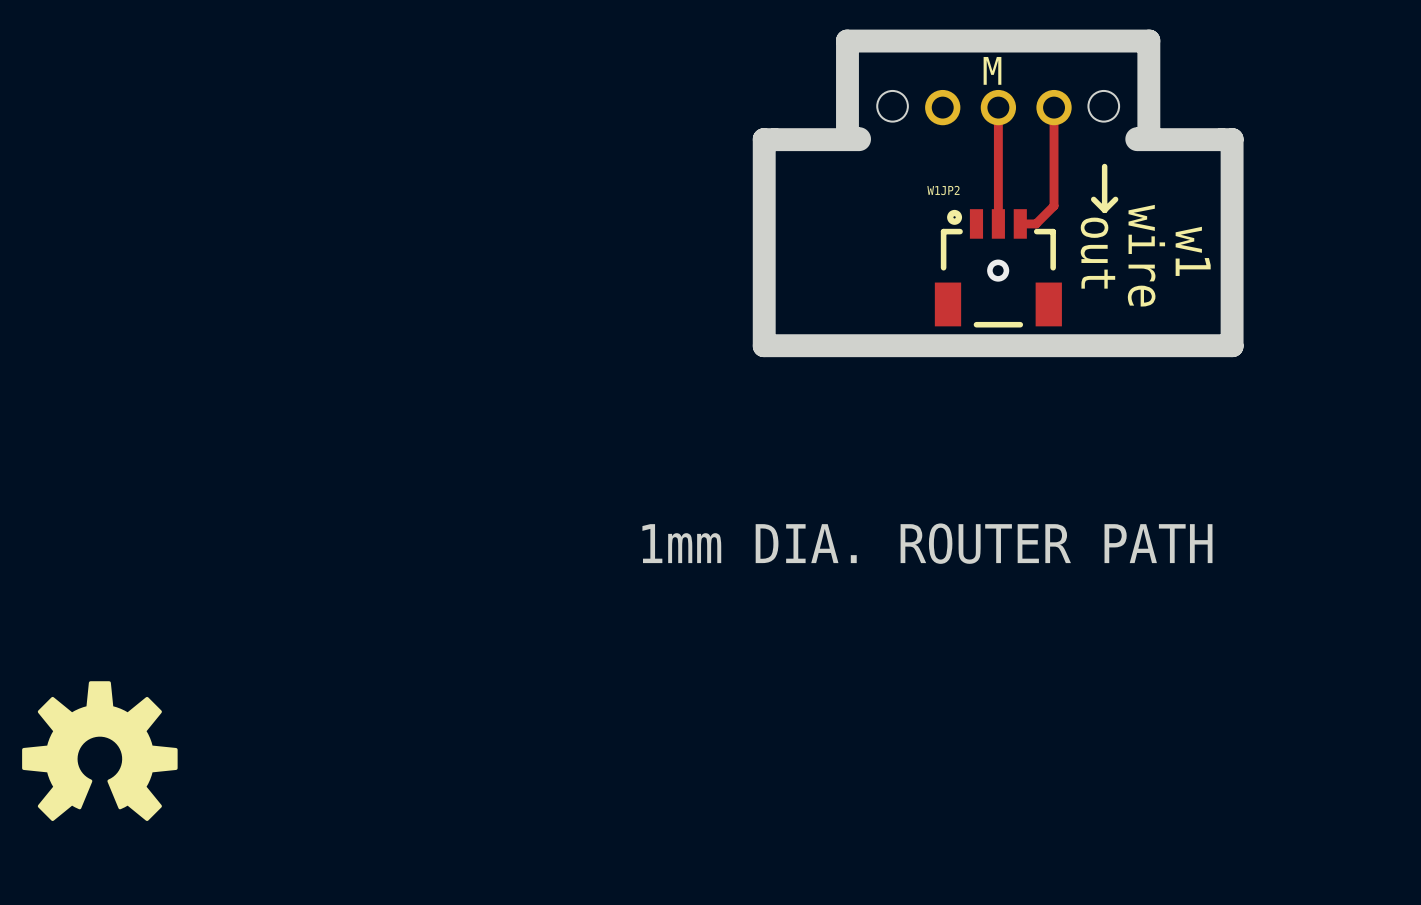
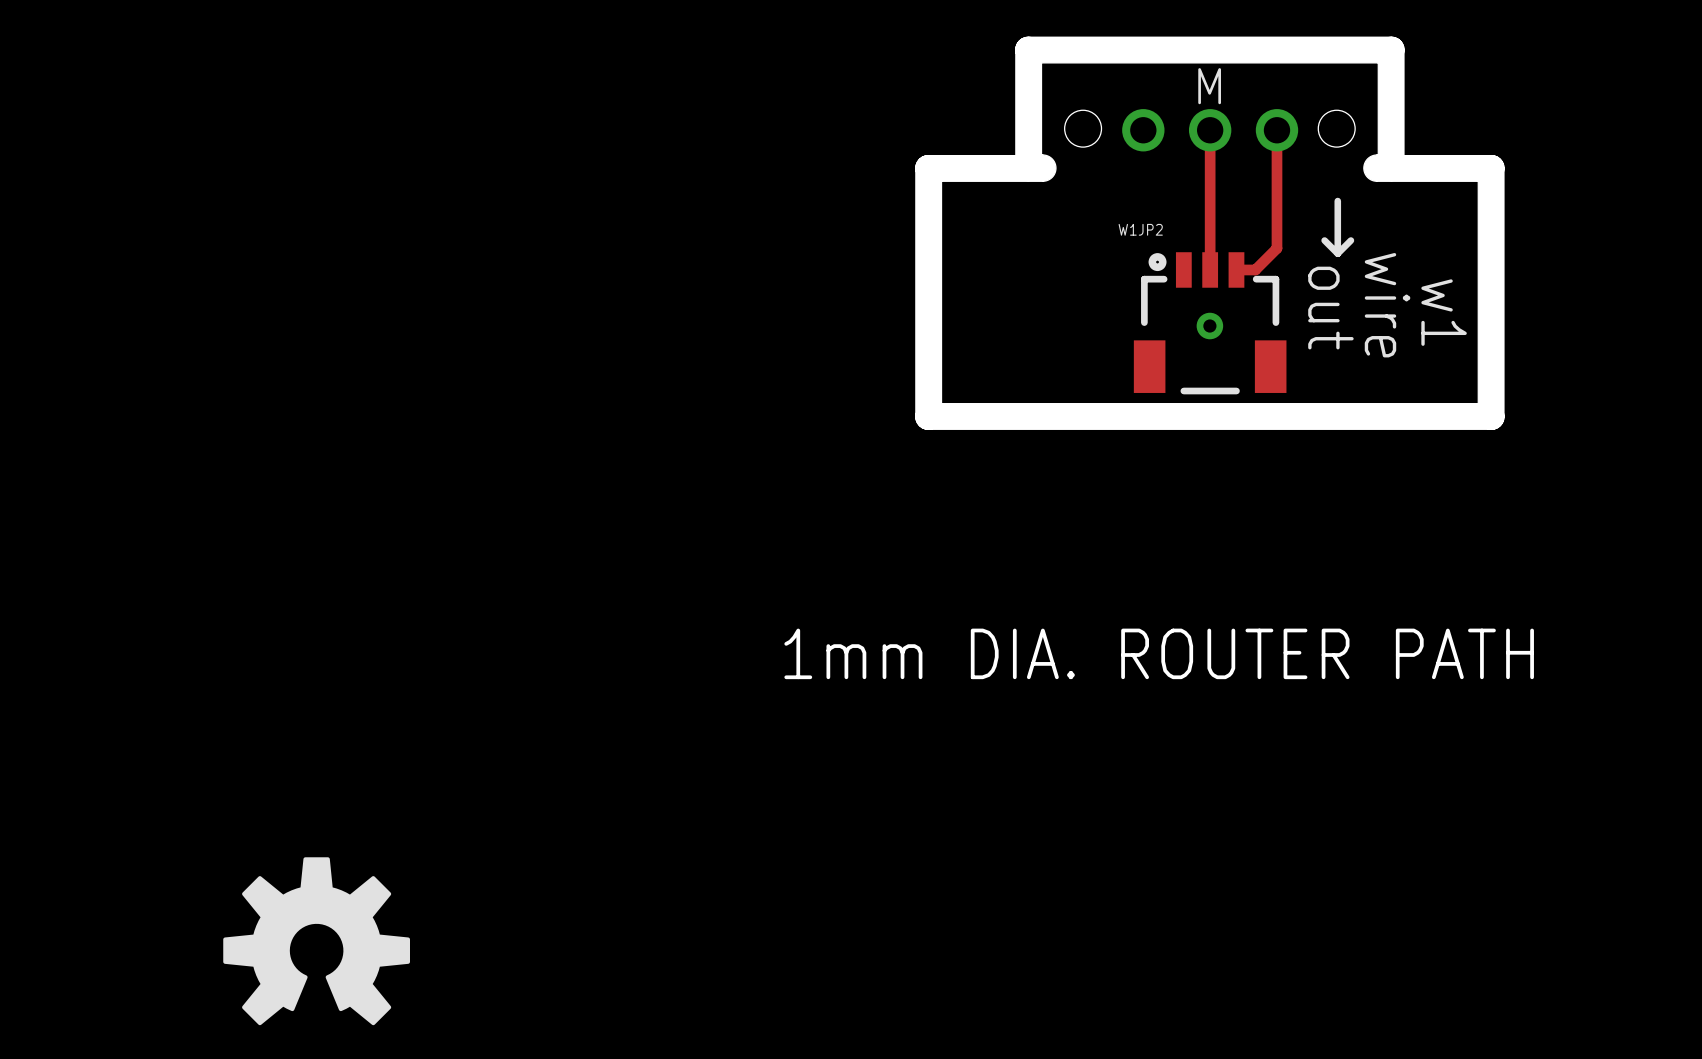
drawing position: (99, 751) -> (316, 941)

